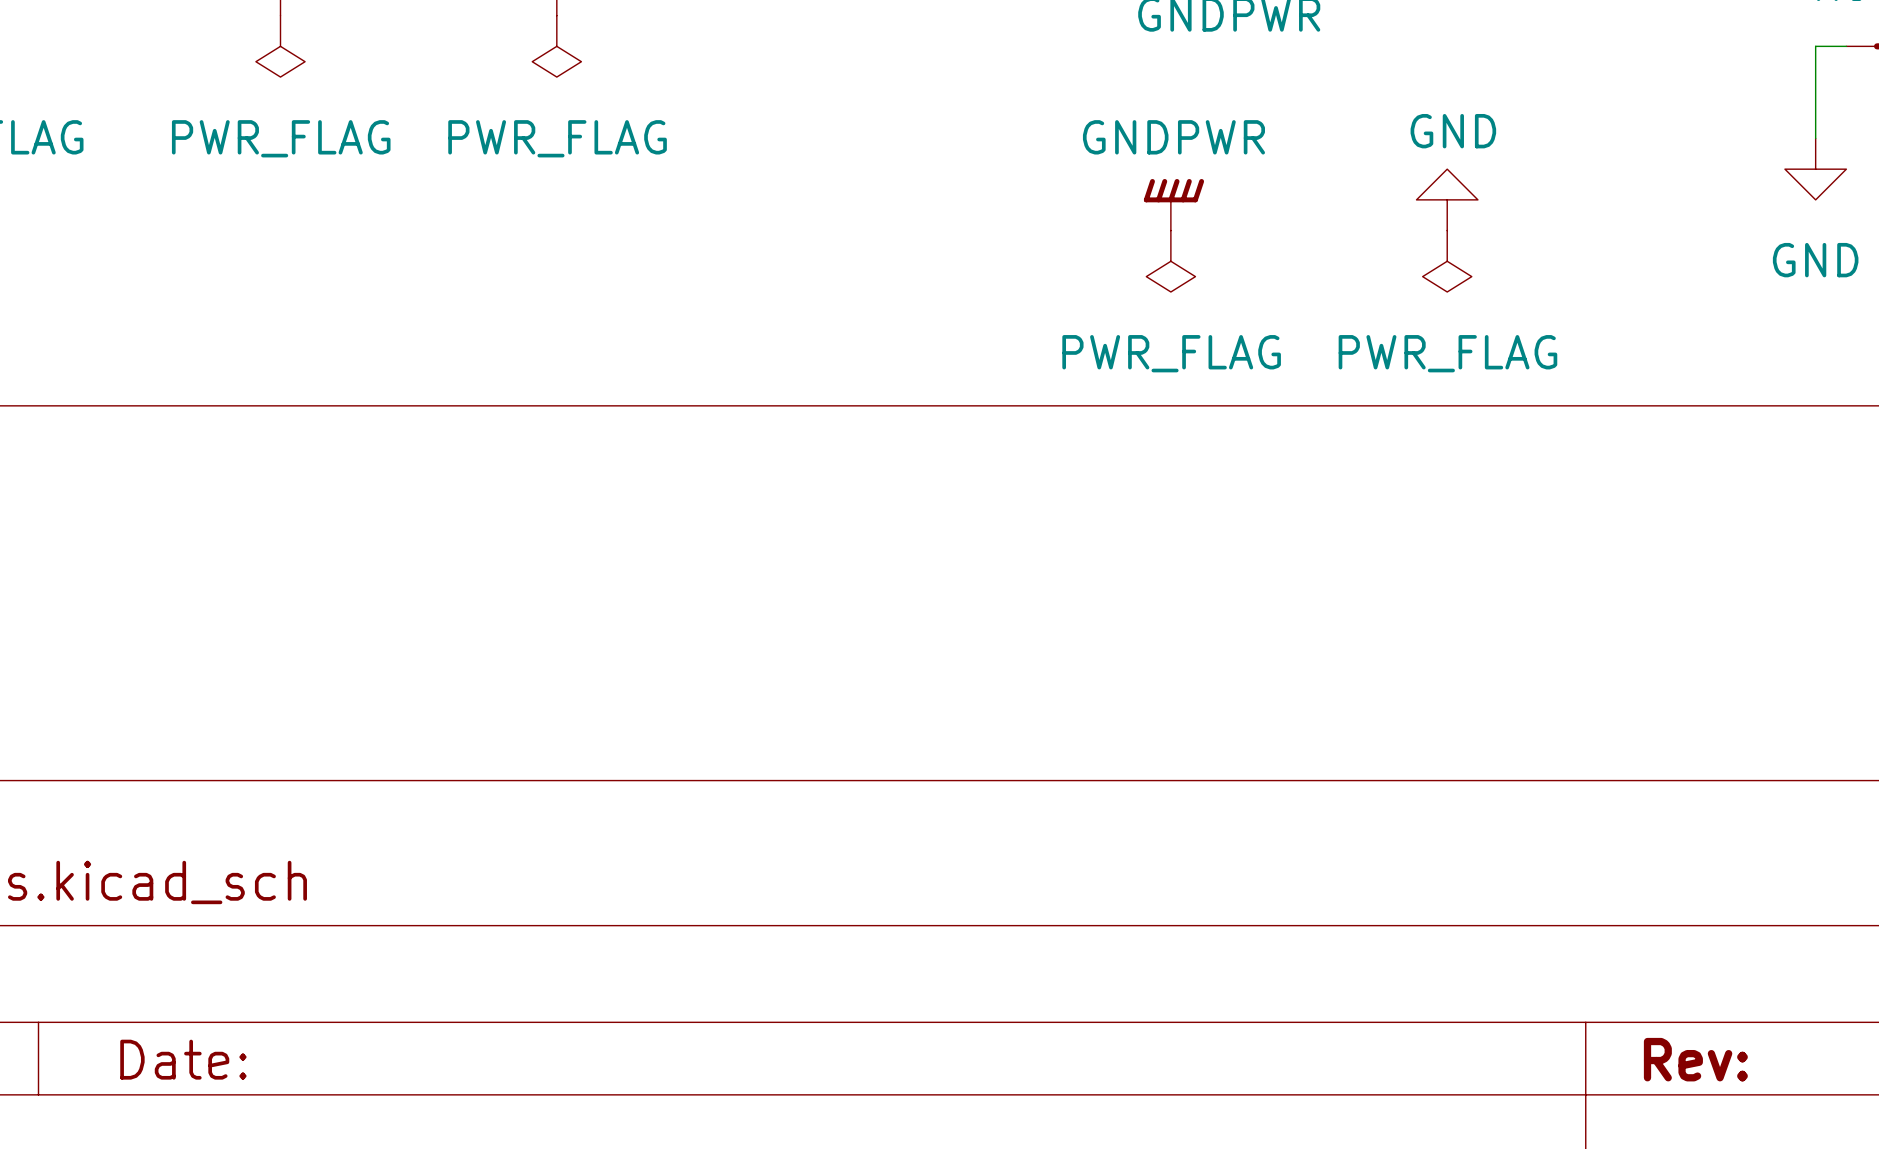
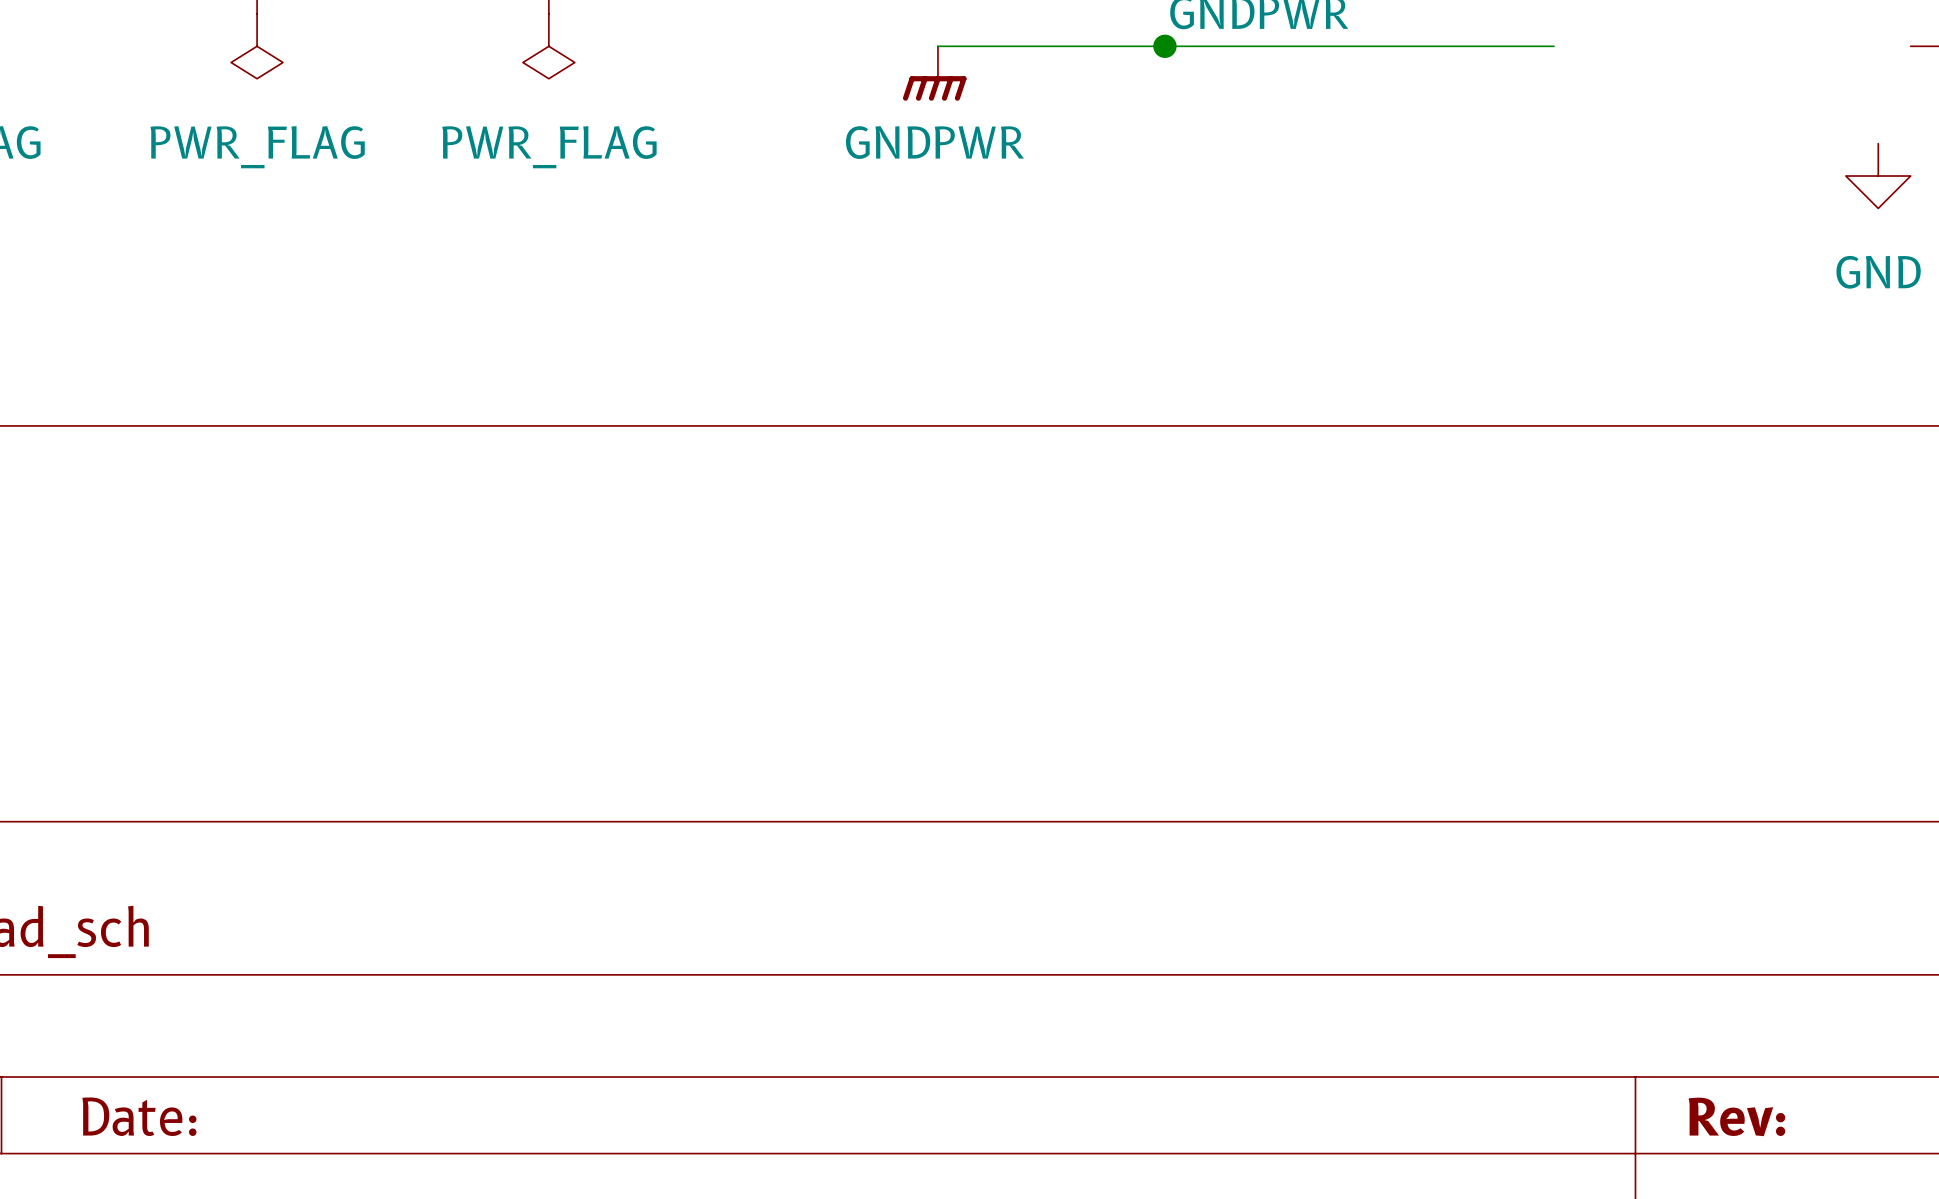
wire: none -> (937, 46) (1554, 46)
junction: none -> (1164, 46)
wire: (1846, 46) (1815, 46) (1815, 138) -> none
power symbol: GND (1447, 199) -> none
power symbol rotation: 0° (1173, 204) -> 180° (934, 73)
power symbol position: GNDPWR (1173, 204) -> GNDPWR (934, 73)
power symbol: PWR_FLAG (1170, 261) -> none
power symbol: PWR_FLAG (1447, 261) -> none

